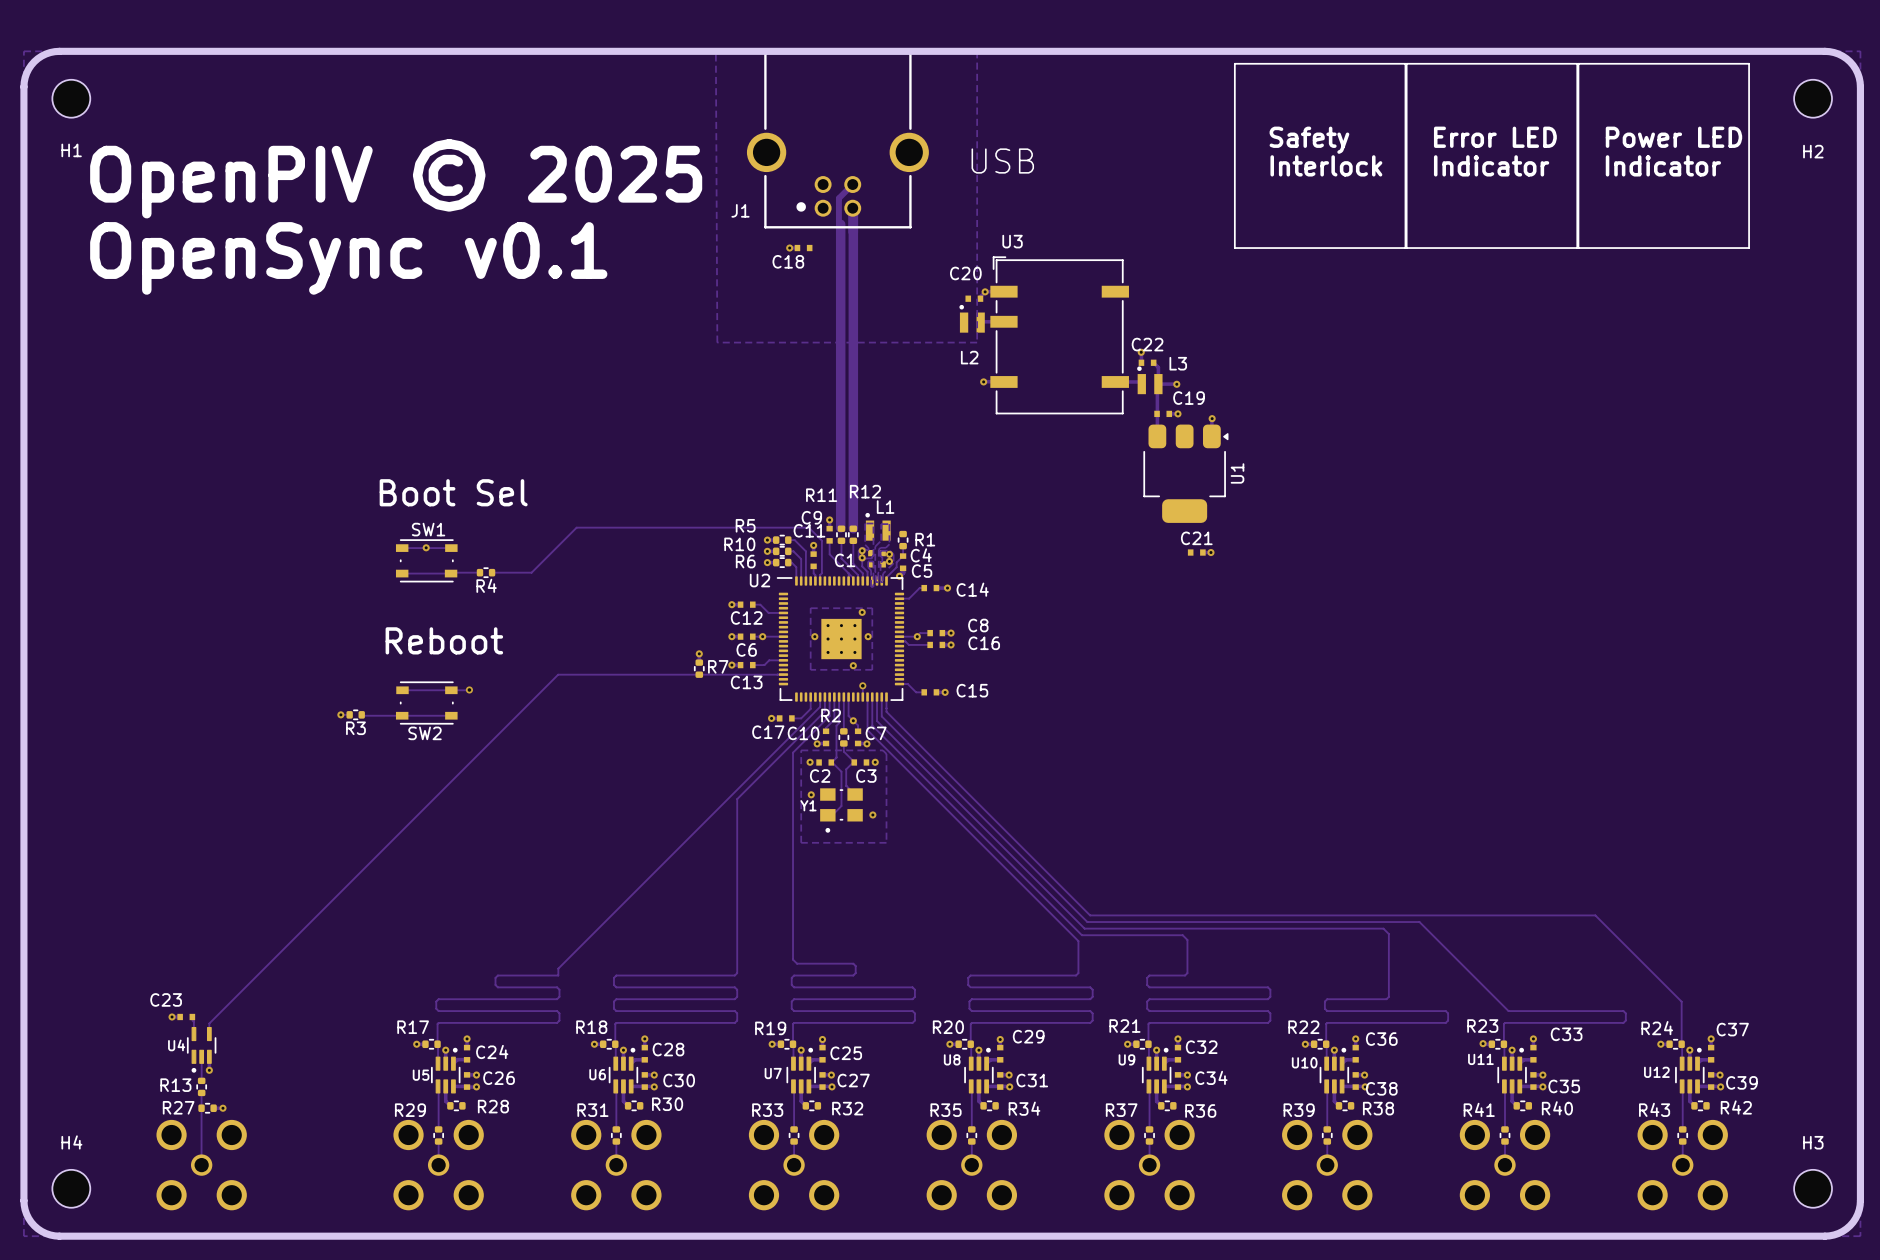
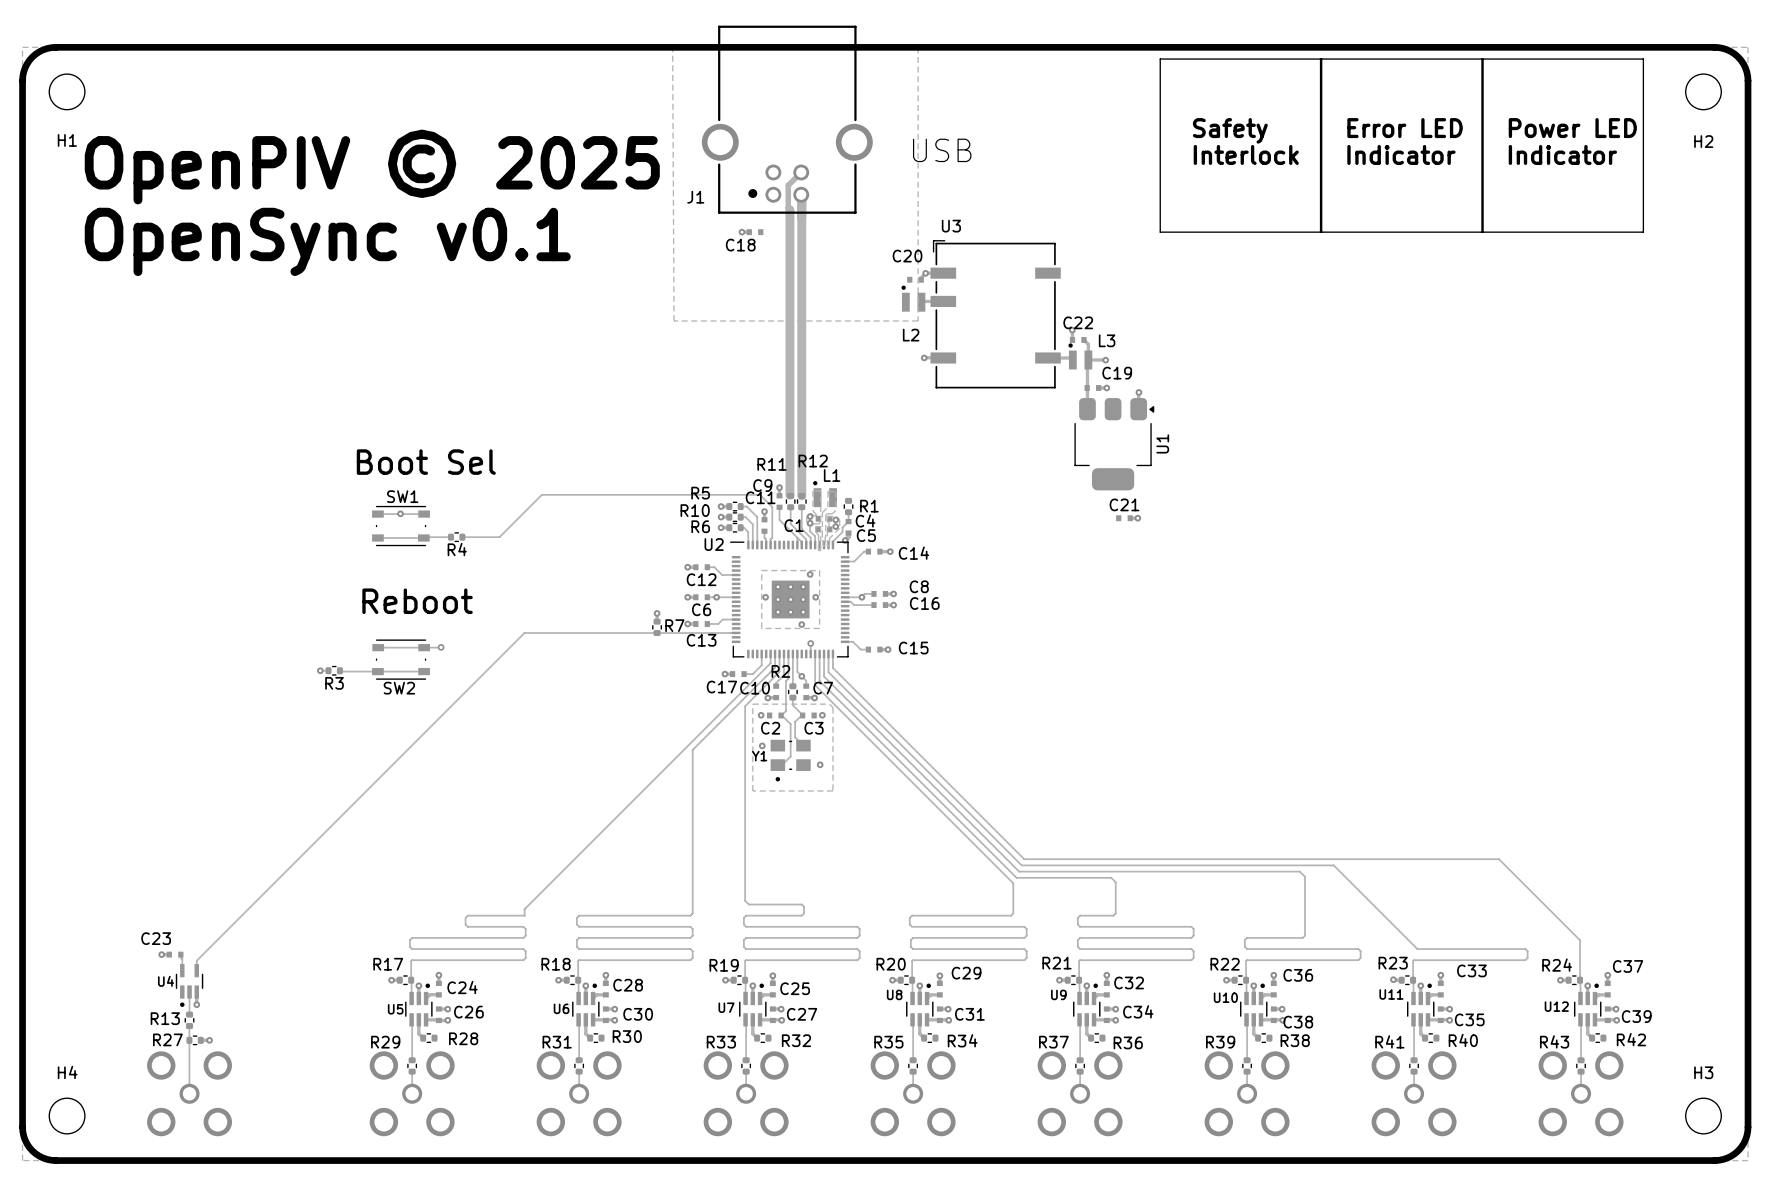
J1 footprint: [746, 51, 929, 229] -> [701, 25, 873, 214]

